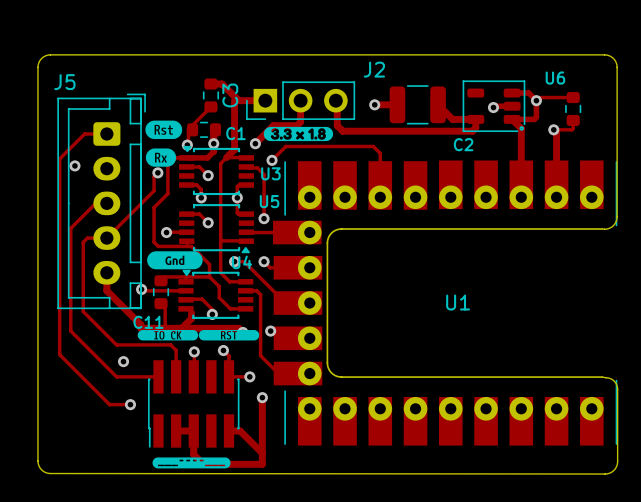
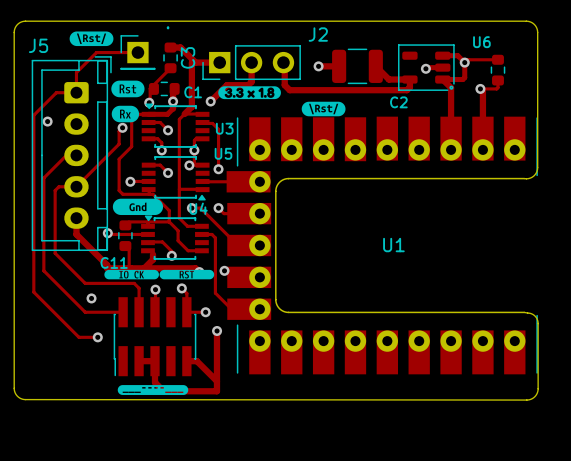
drawing: none -> [69, 31, 114, 47]
track: none -> (137, 52) (96, 52) (76, 72) (76, 92)
part: none -> (137, 52)
drawing: none -> [301, 101, 346, 117]
track: (272, 160) (285, 146) (373, 146) (380, 153) (380, 185) -> none
via position: (272, 160) -> (189, 165)

